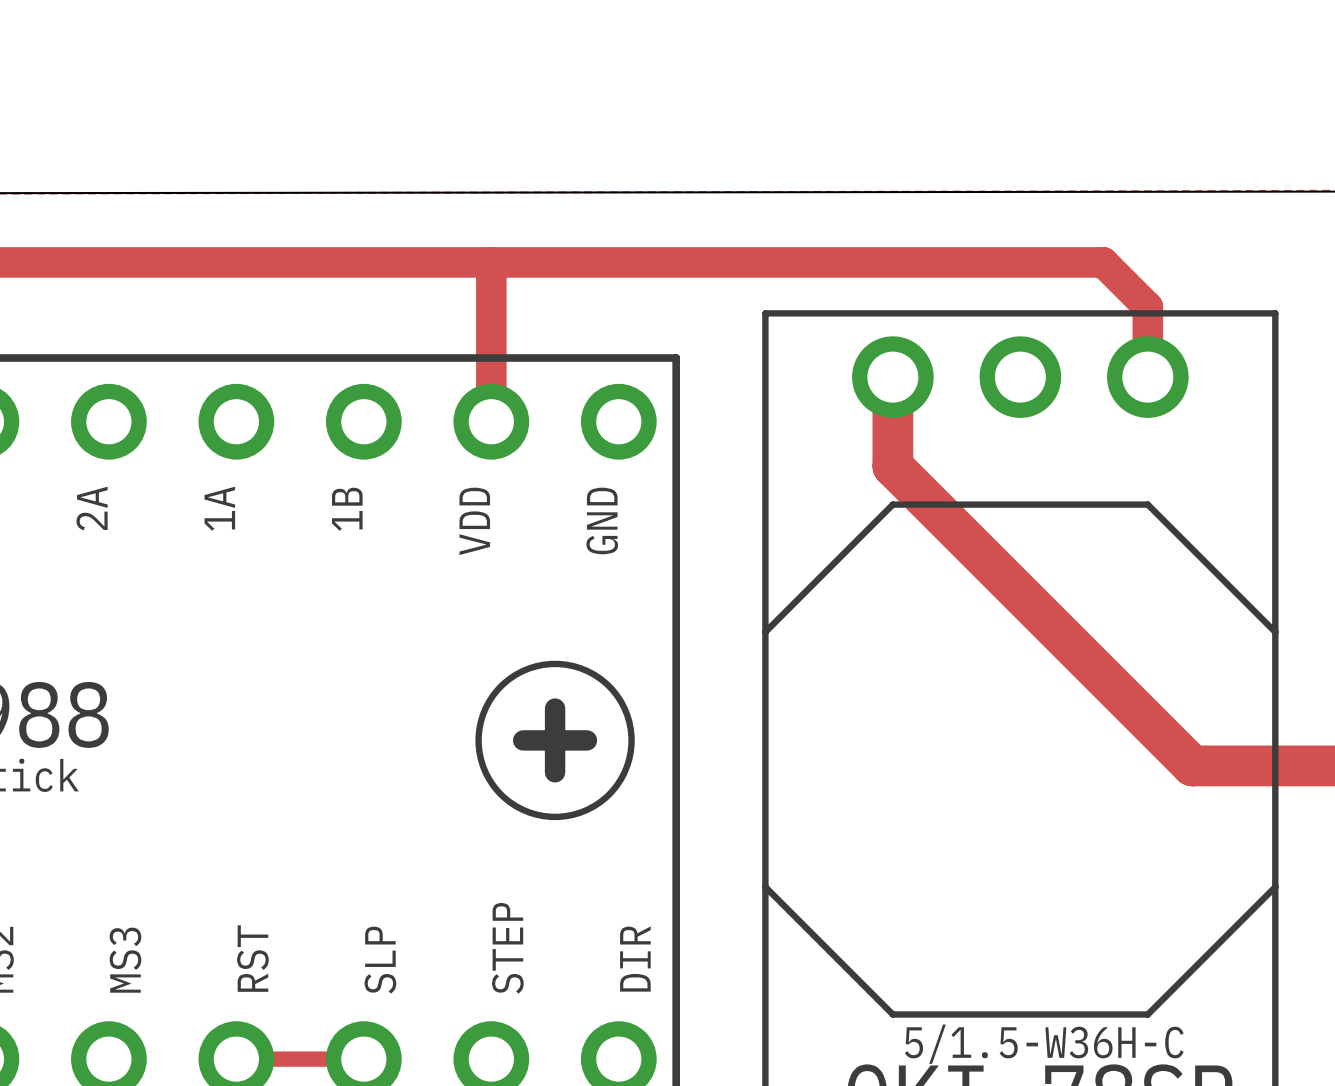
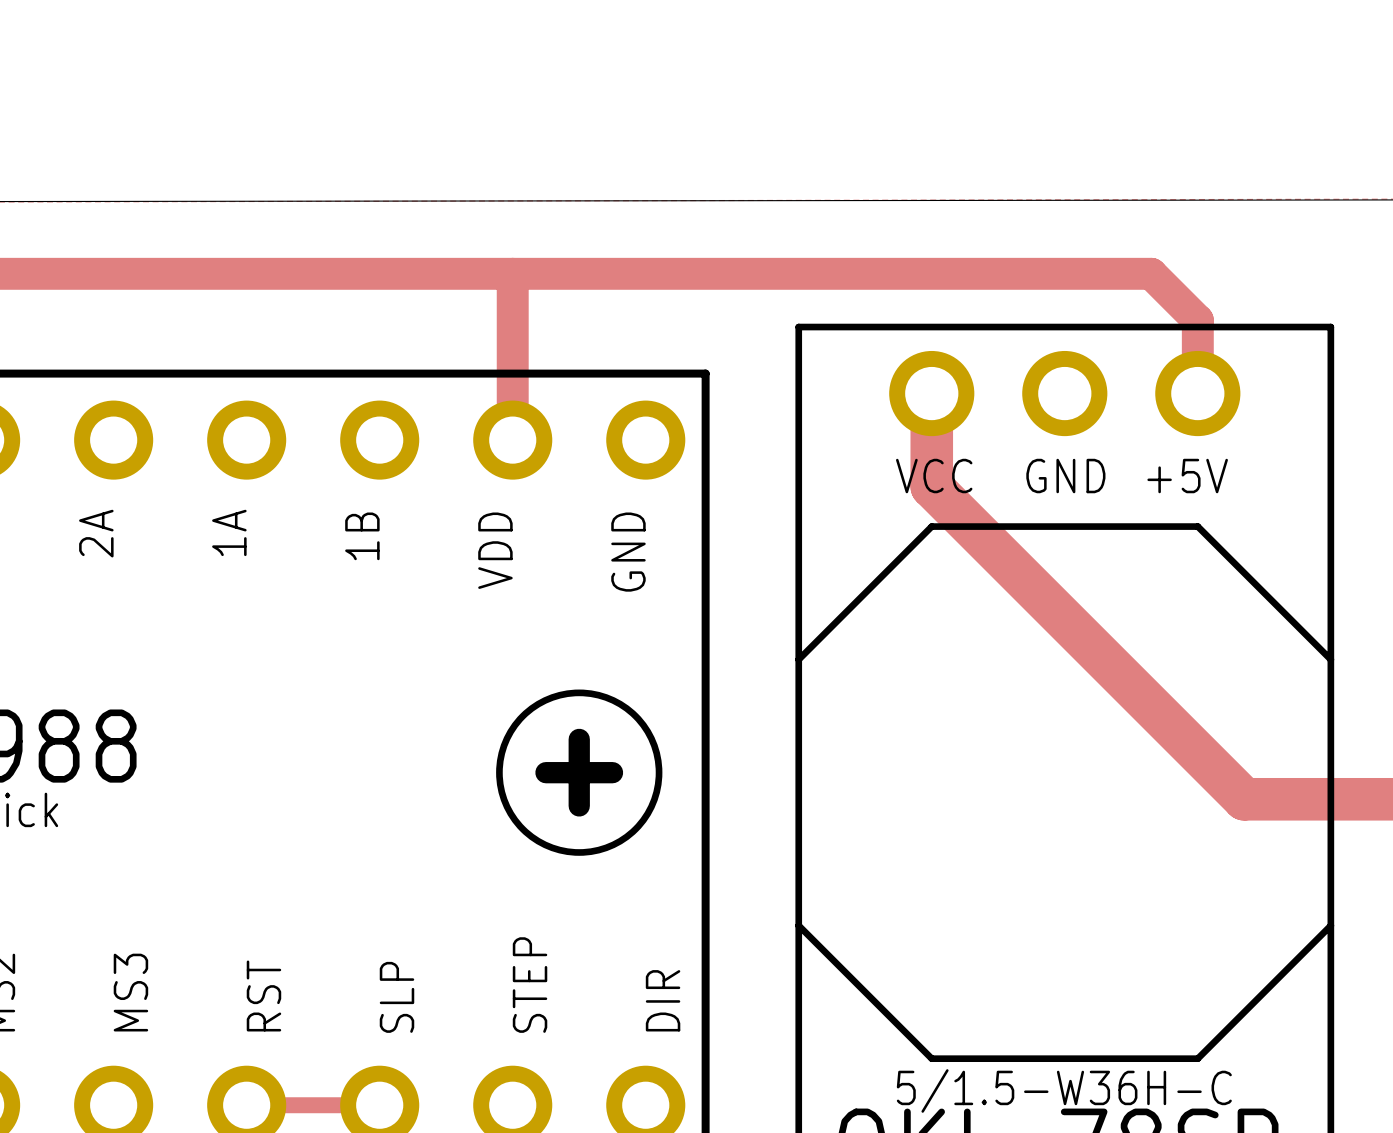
text: none -> VCC (934, 476)
text: none -> GND (1065, 476)
text: none -> +5V (1187, 476)

